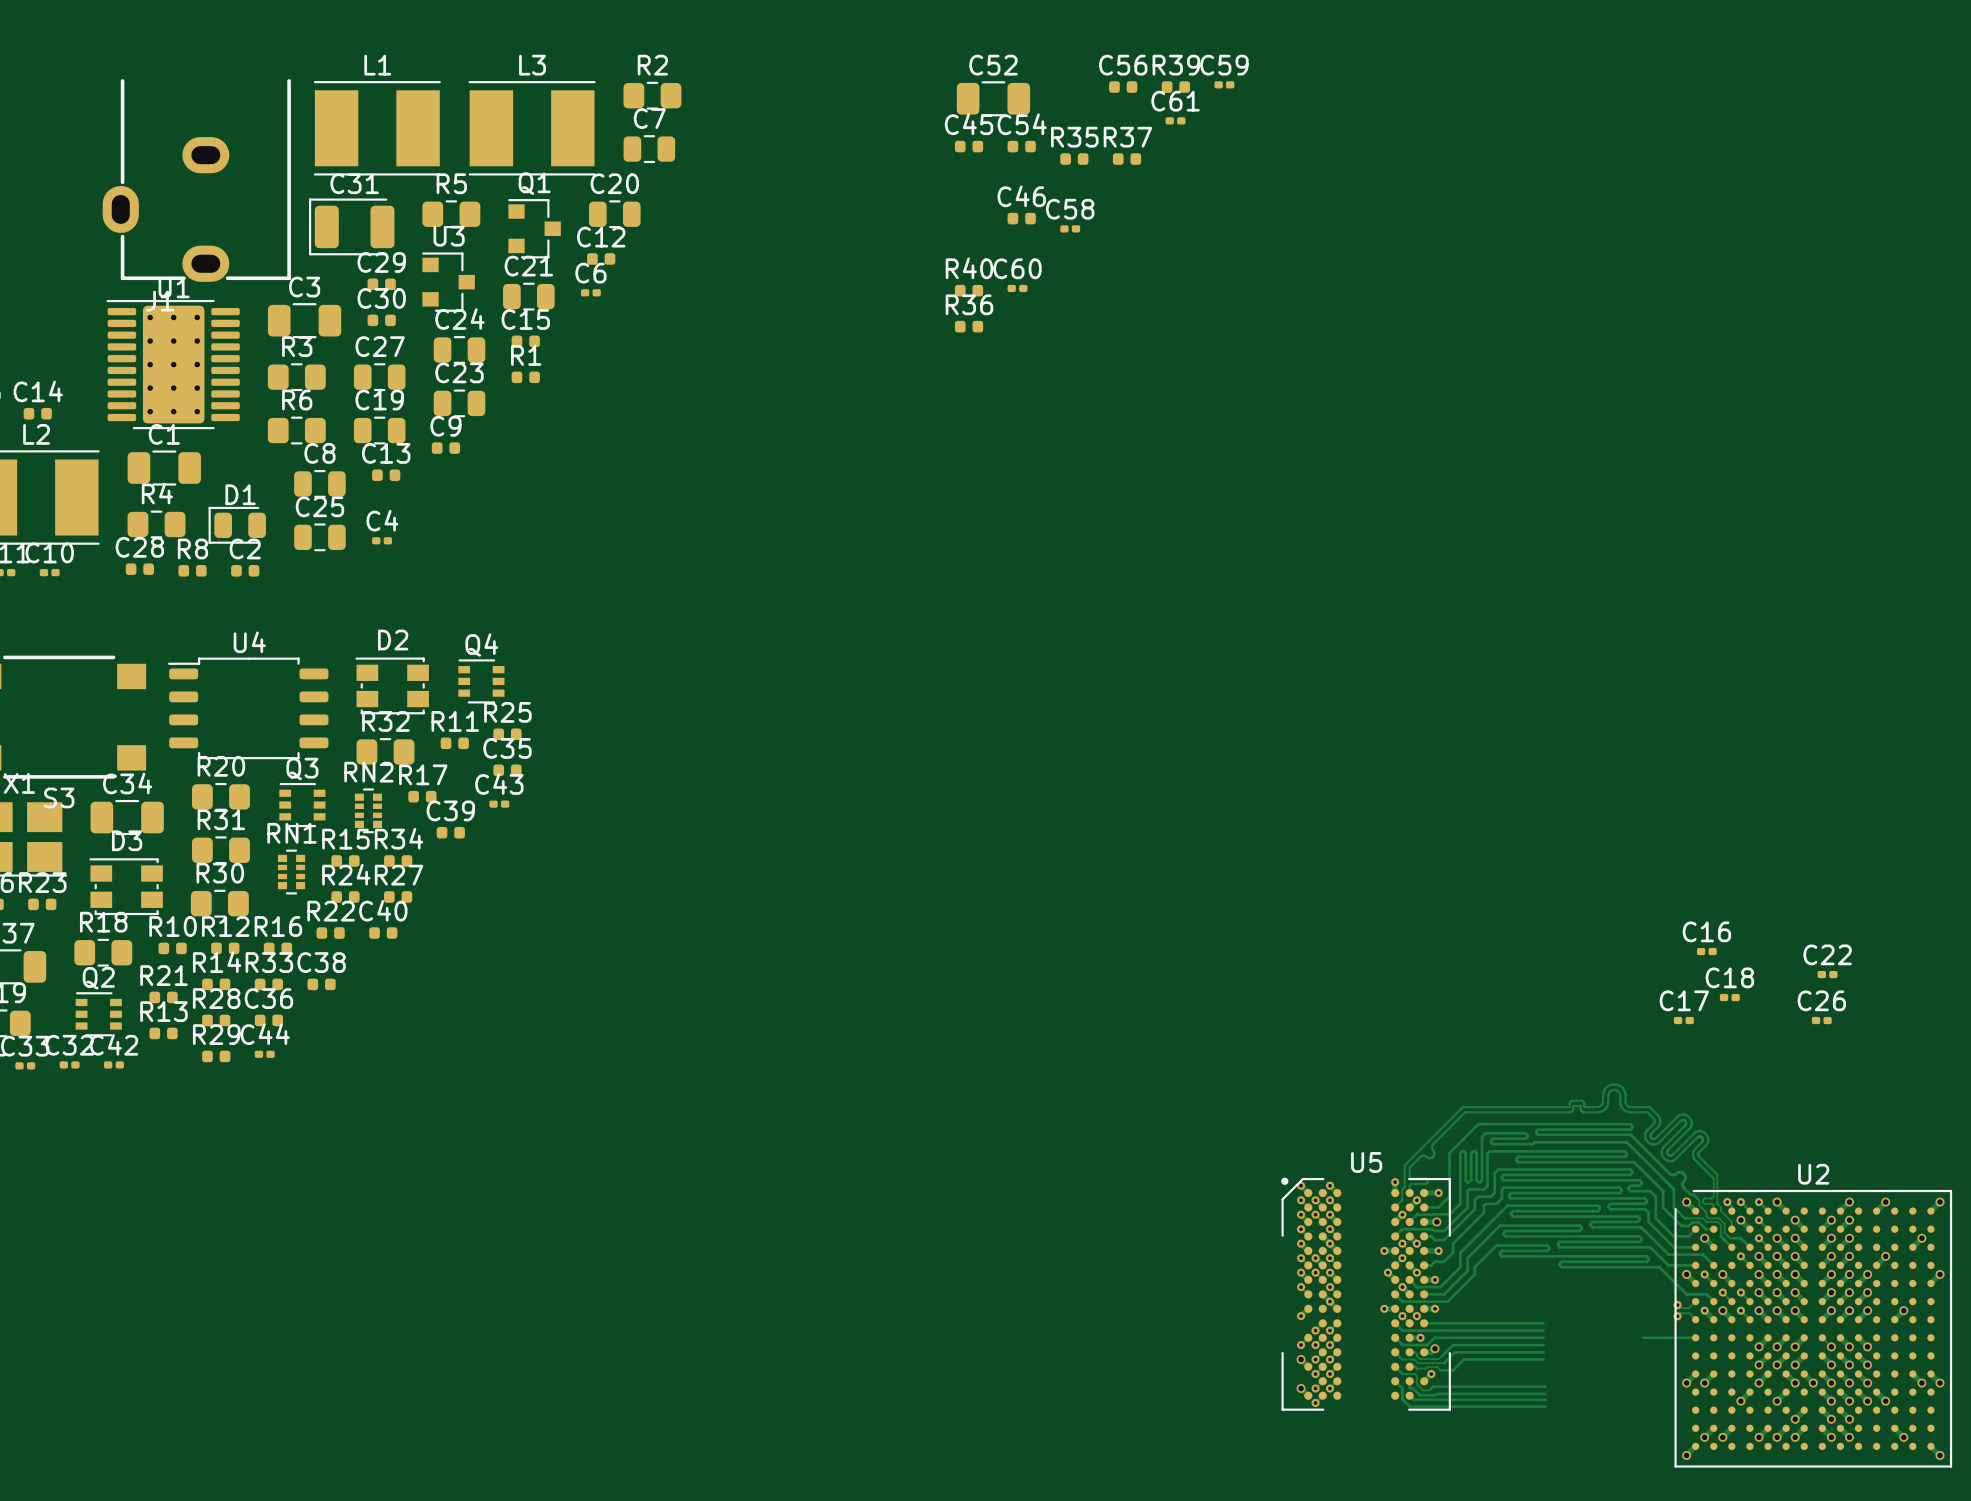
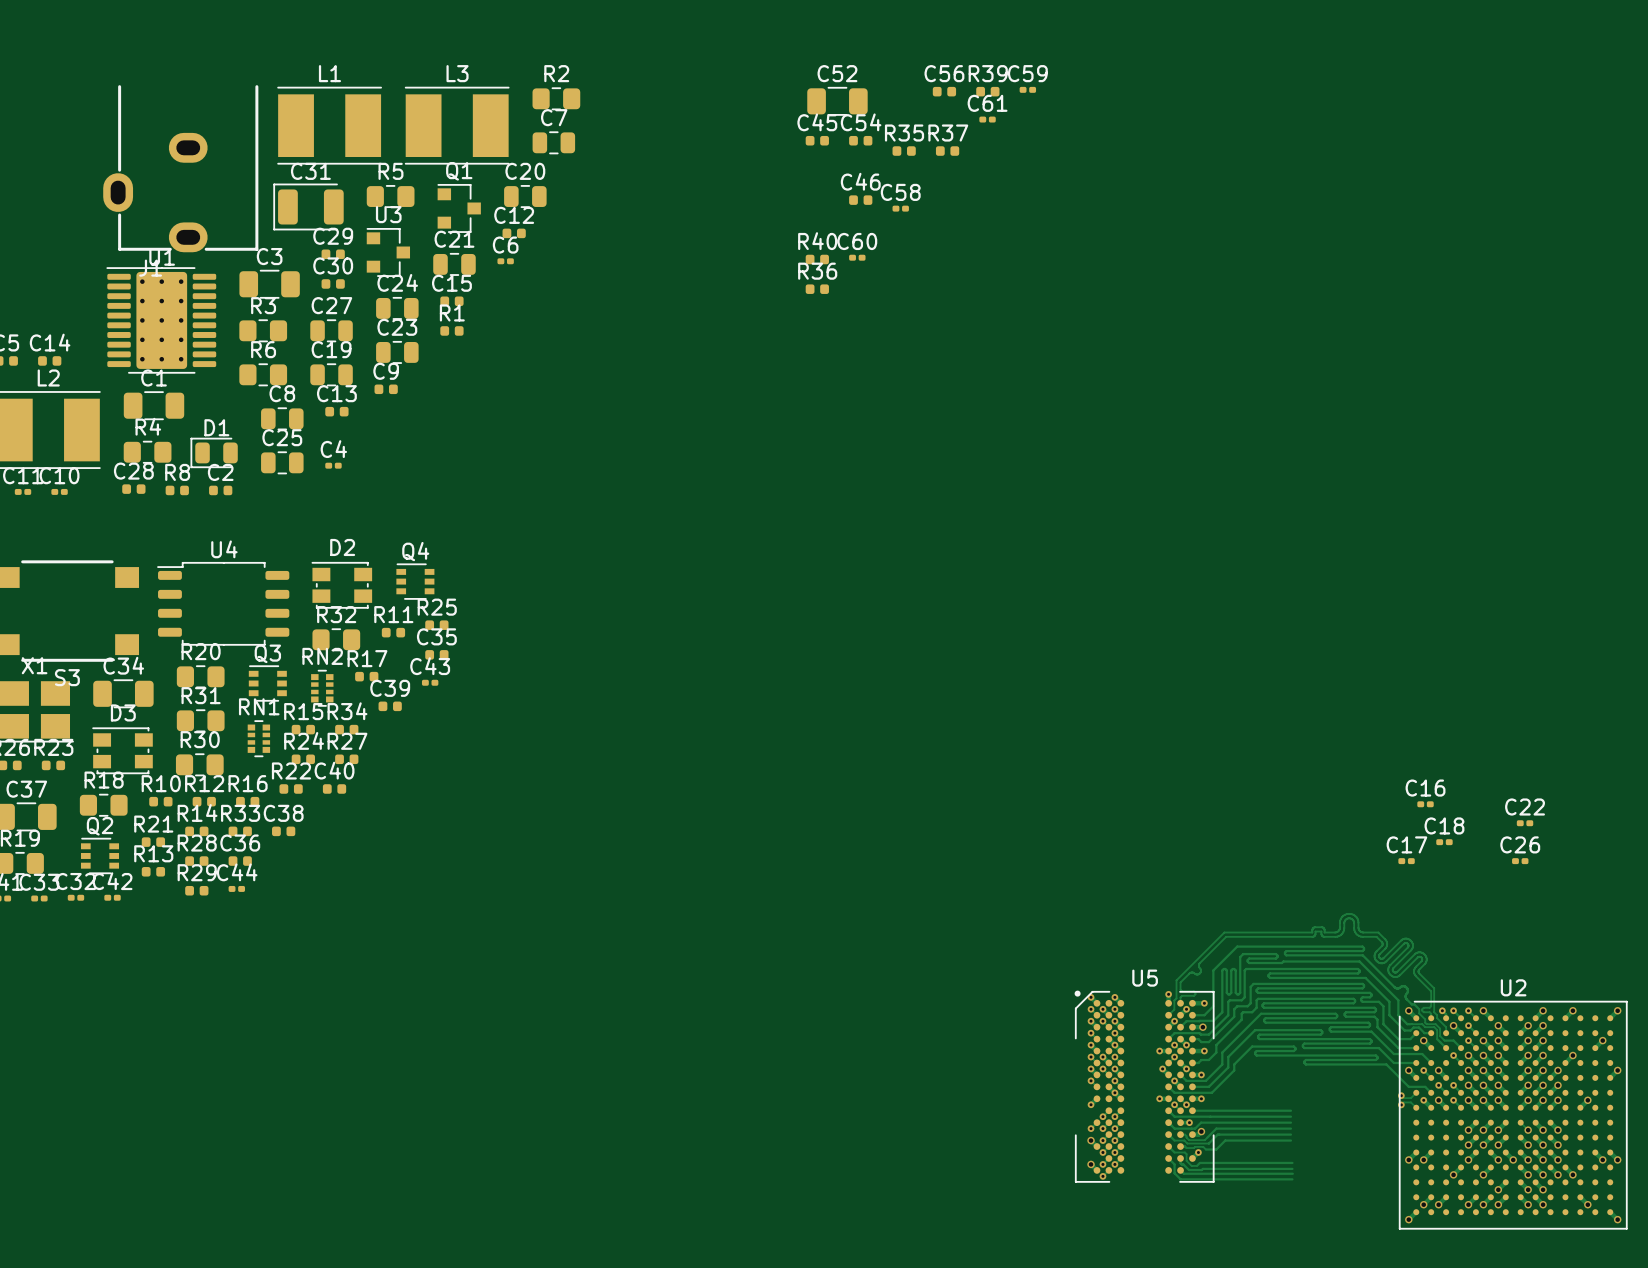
track: (1643, 1337) (1695, 1337) -> none

